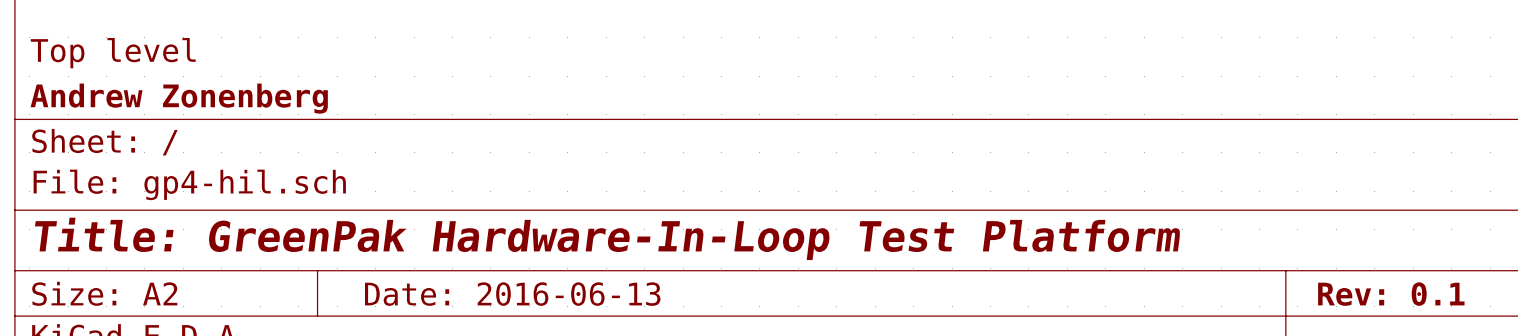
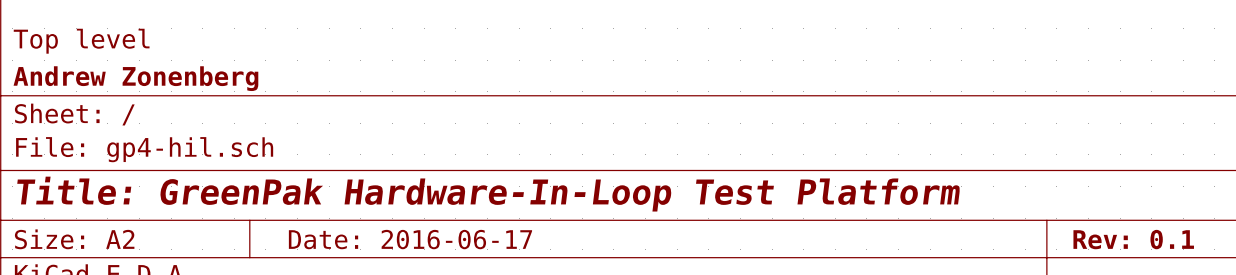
title block: Date: 2016-06-13 (512, 294) -> Date: 2016-06-17 (410, 239)

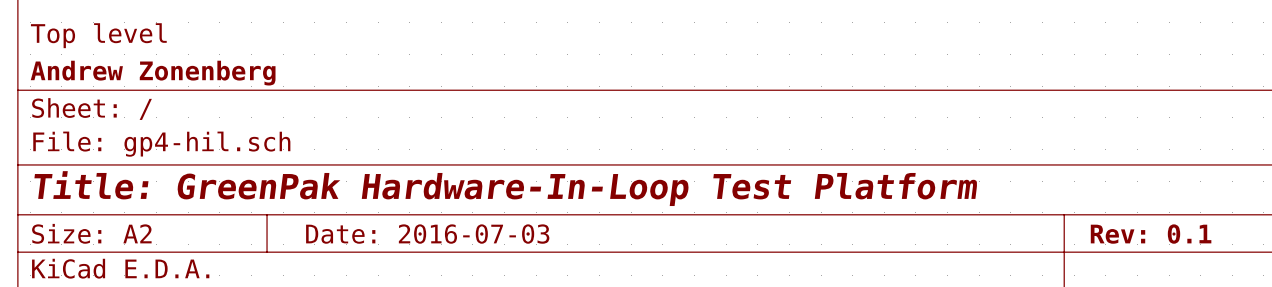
title block: Date: 2016-06-17 (410, 239) -> Date: 2016-07-03 (427, 234)

